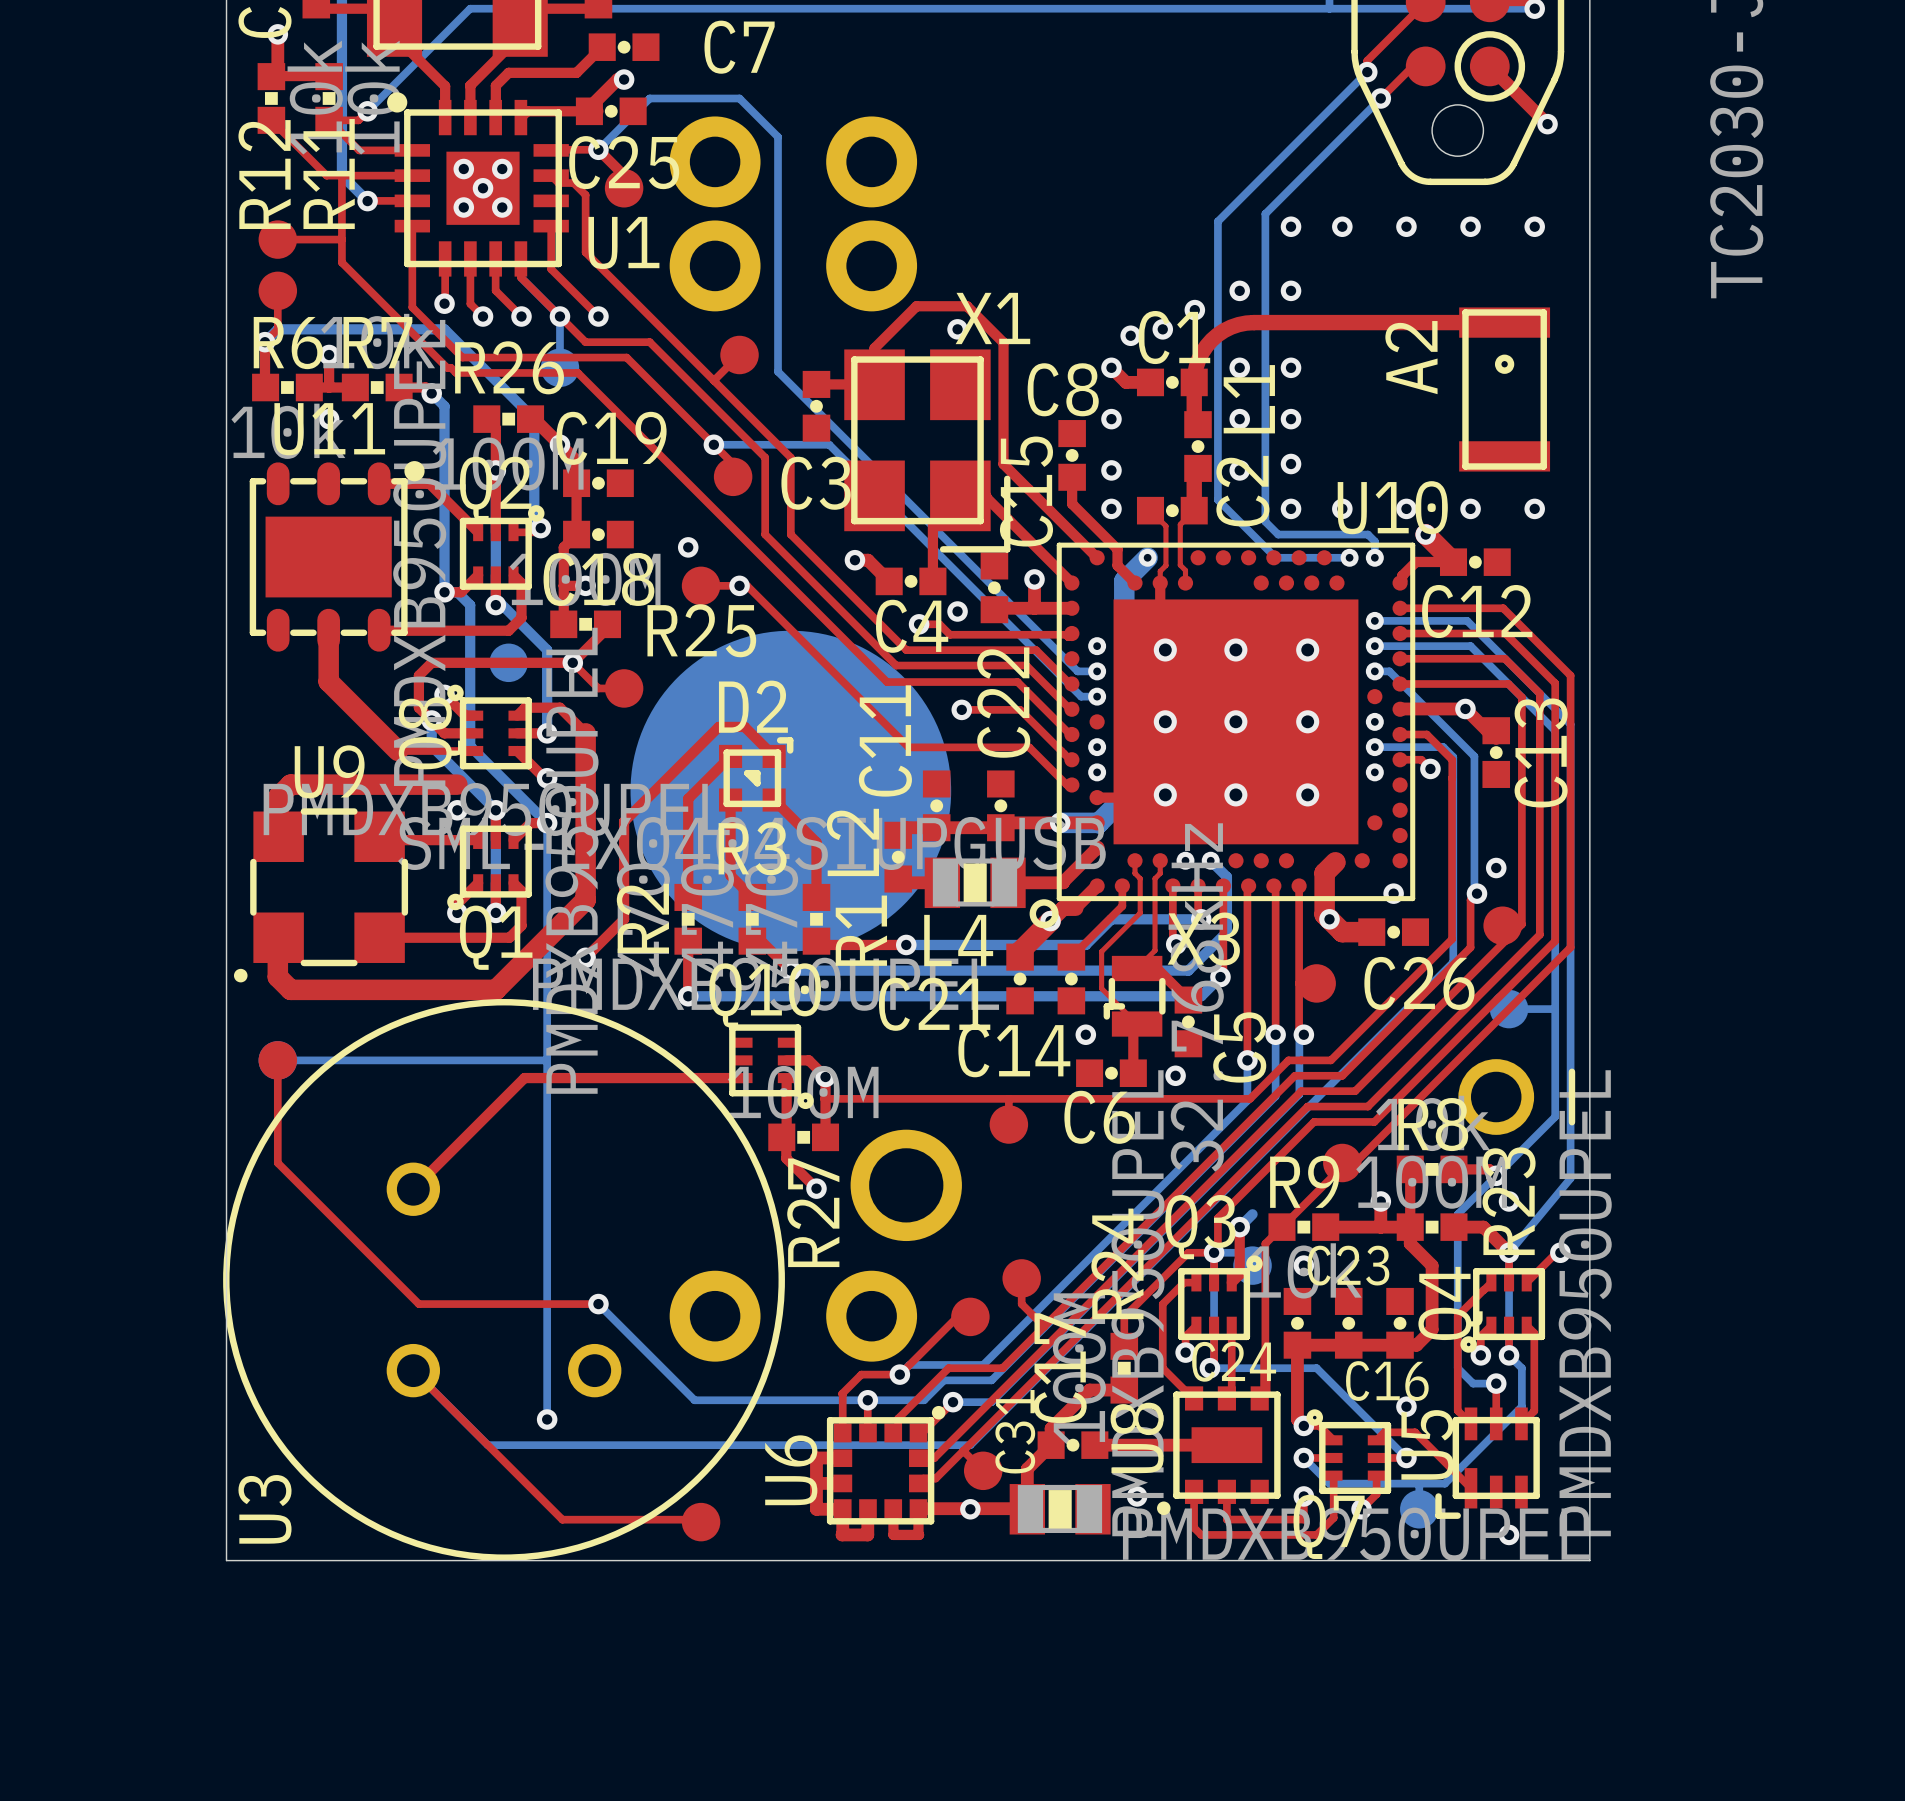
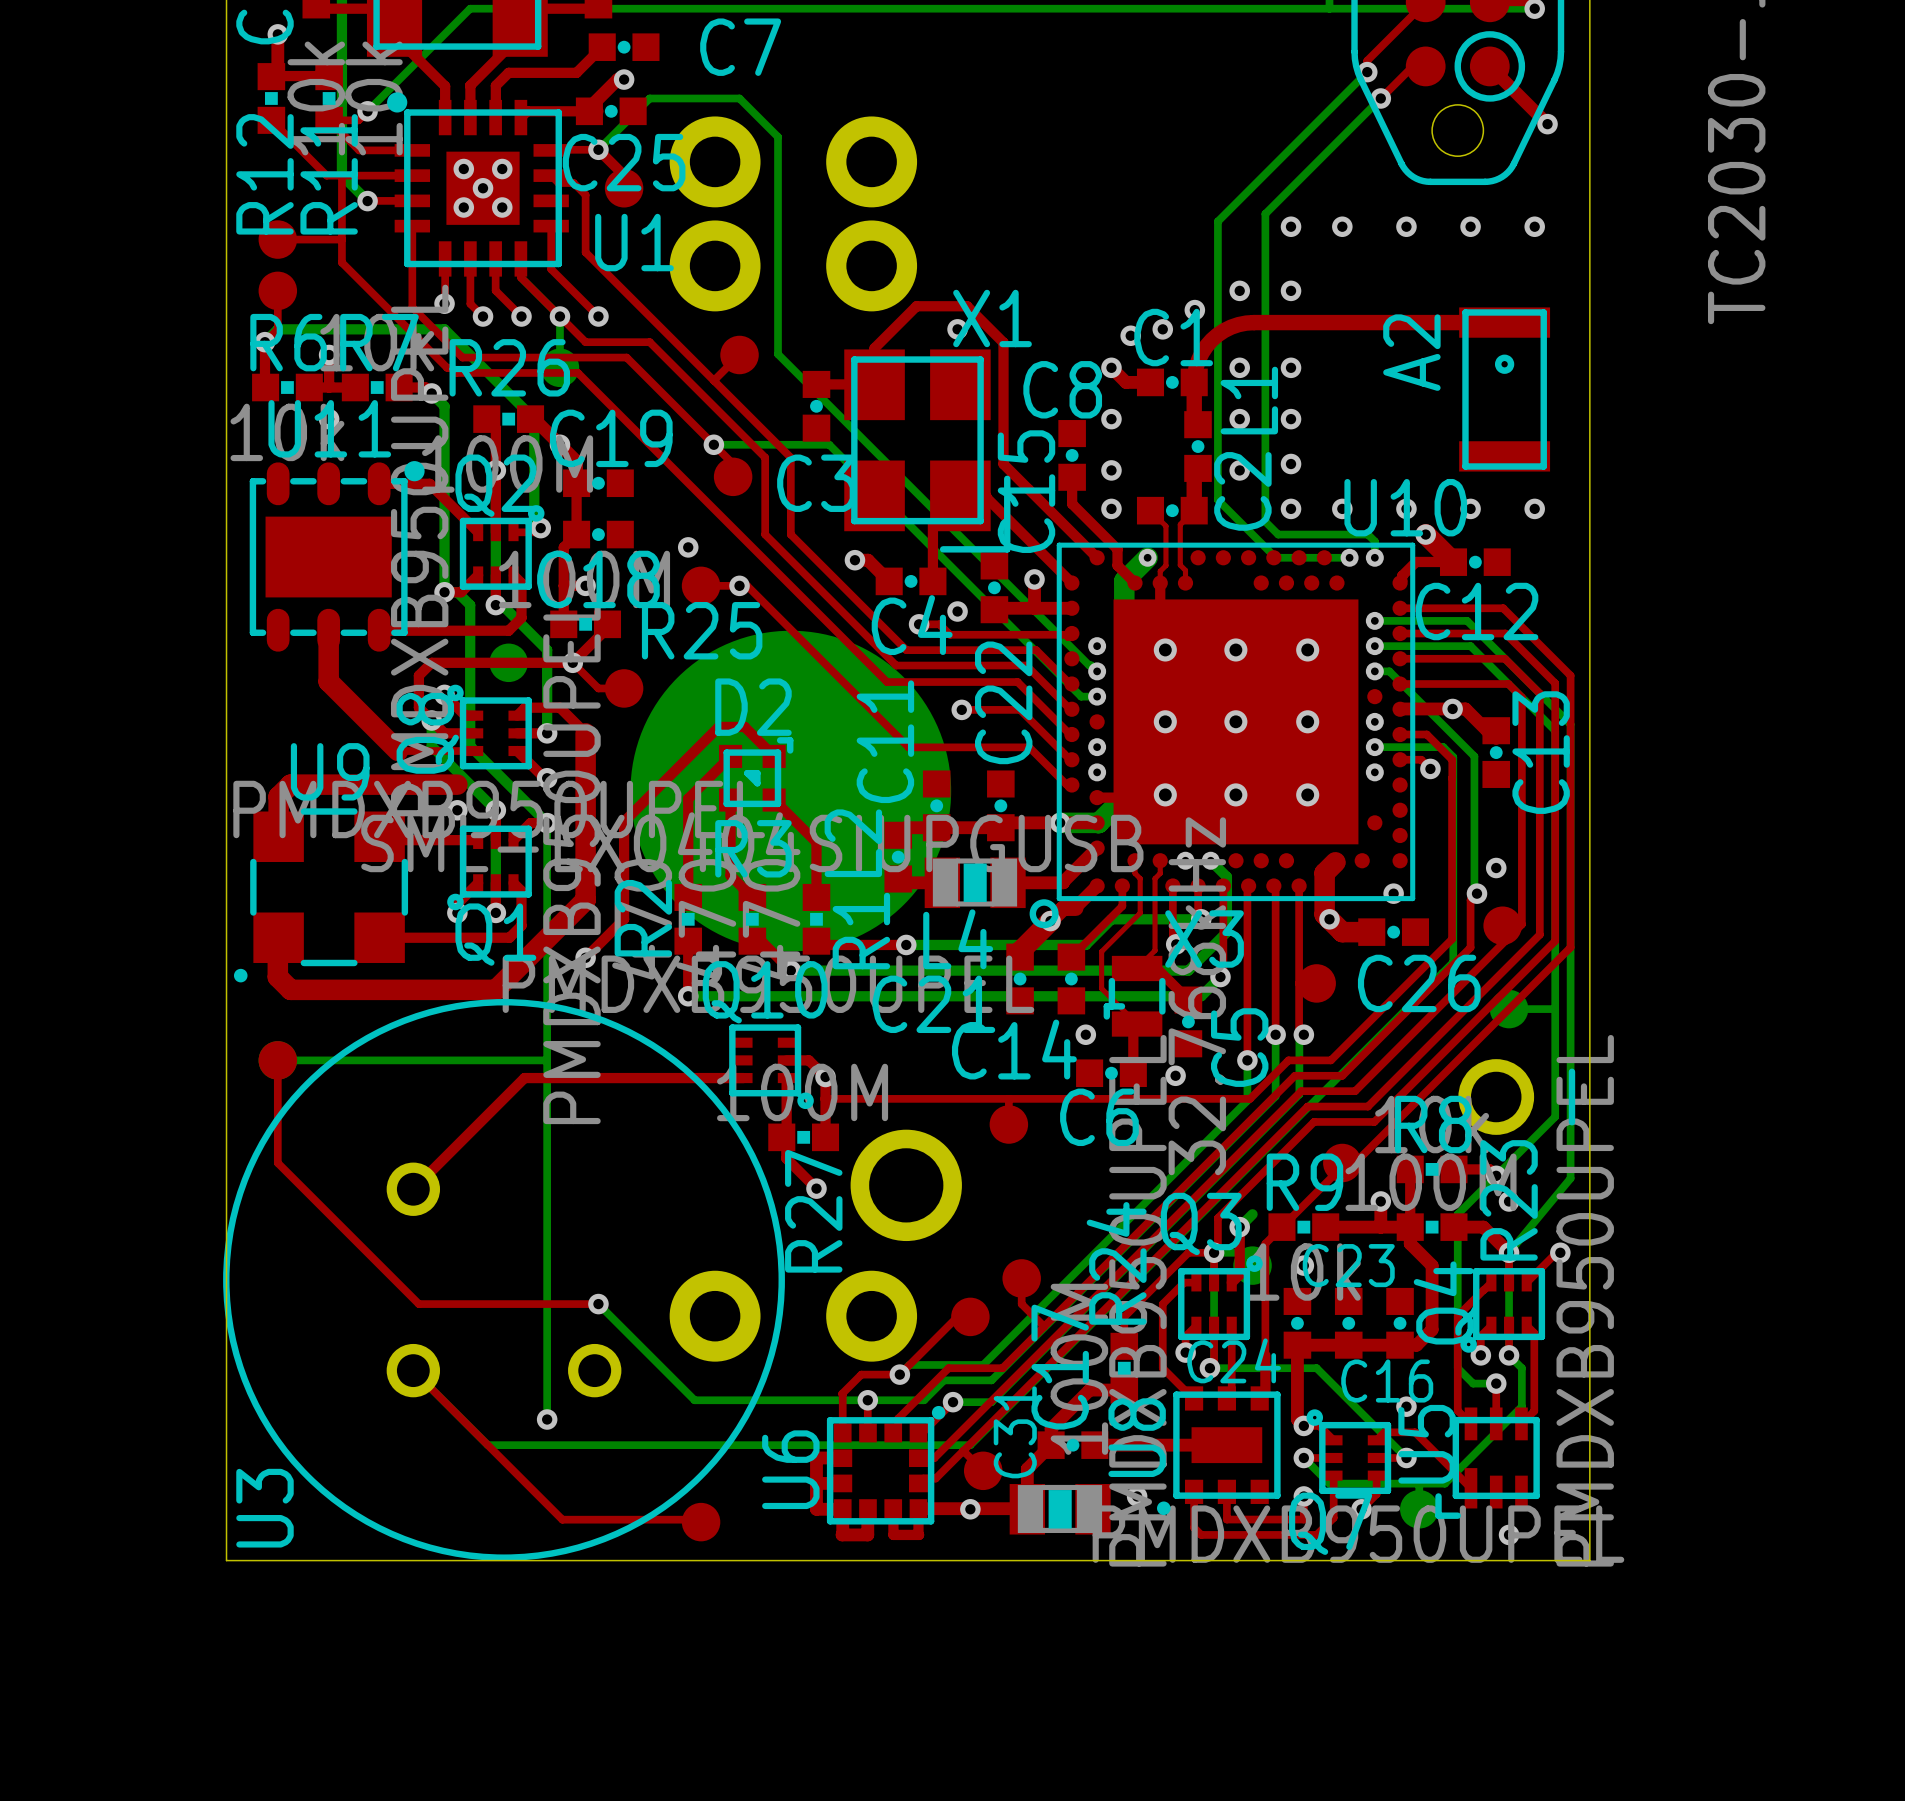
bottom track: (778, 354) (778, 371) (1077, 671) (1097, 671) -> (778, 354) (1097, 671)
via position: (1465, 708) -> (1452, 708)

